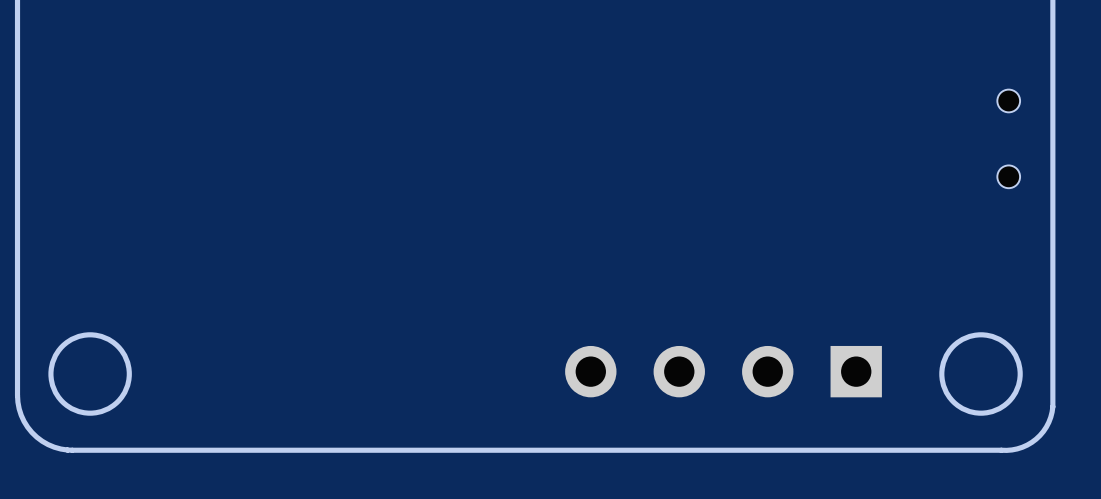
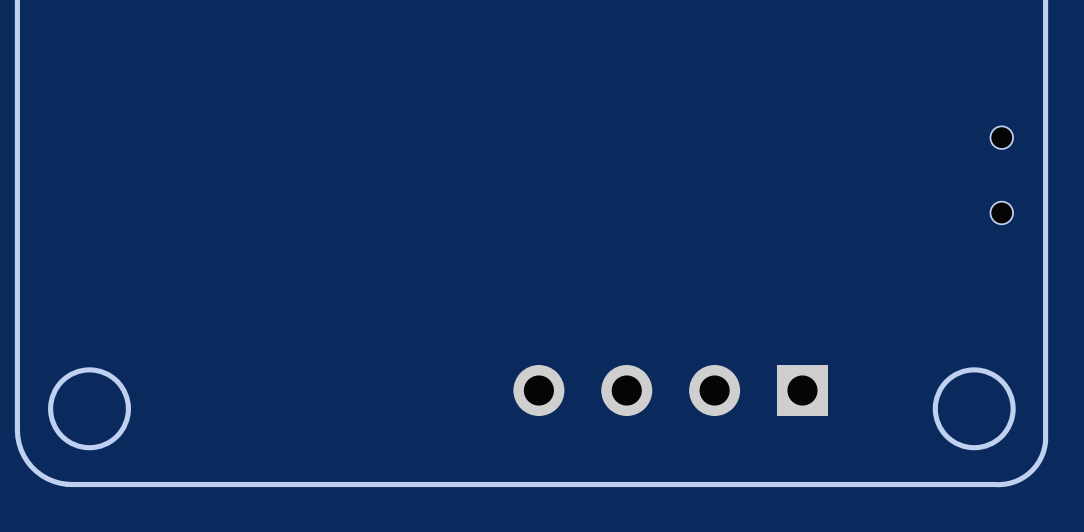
part position: (723, 371) -> (670, 390)

